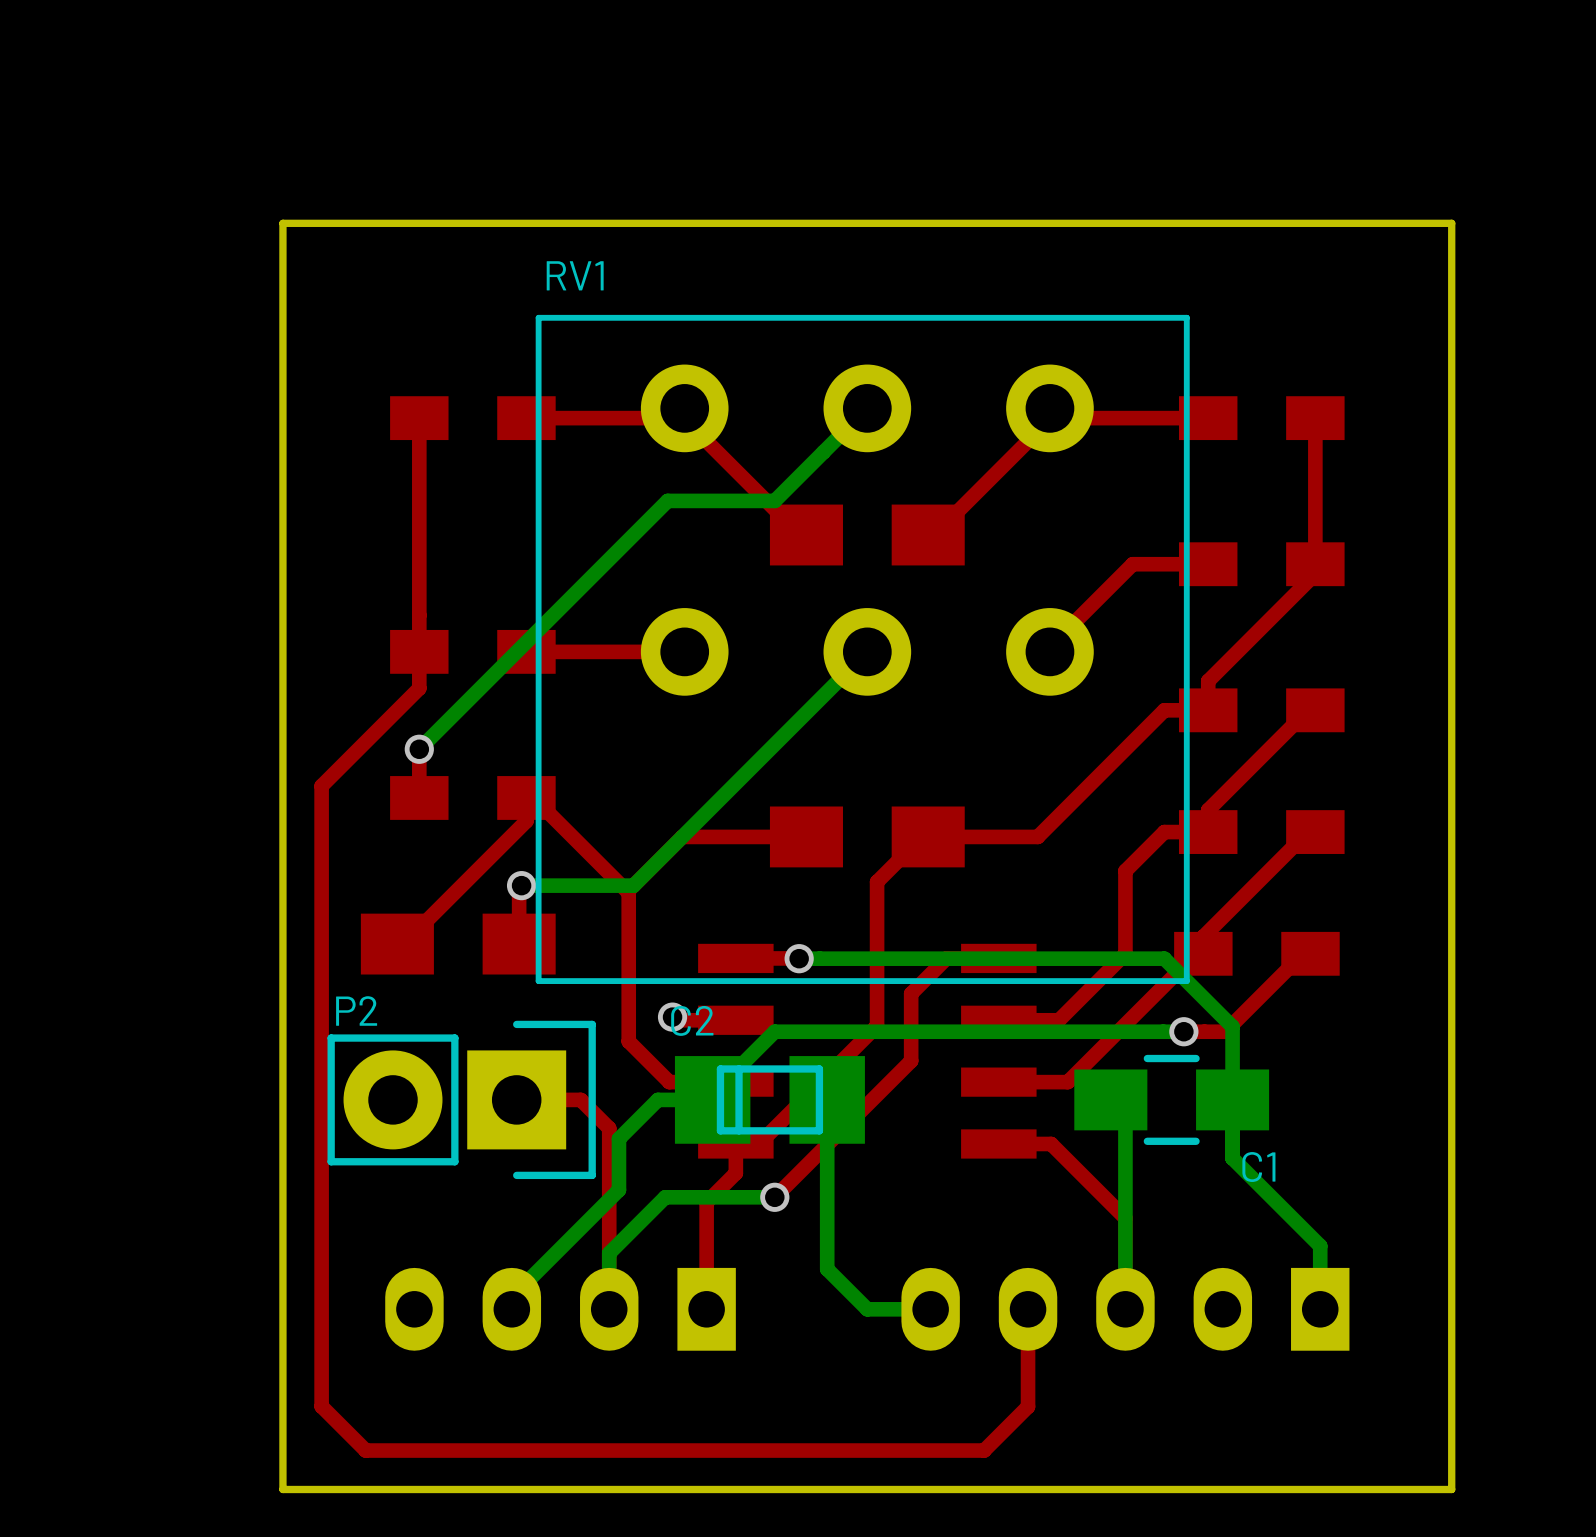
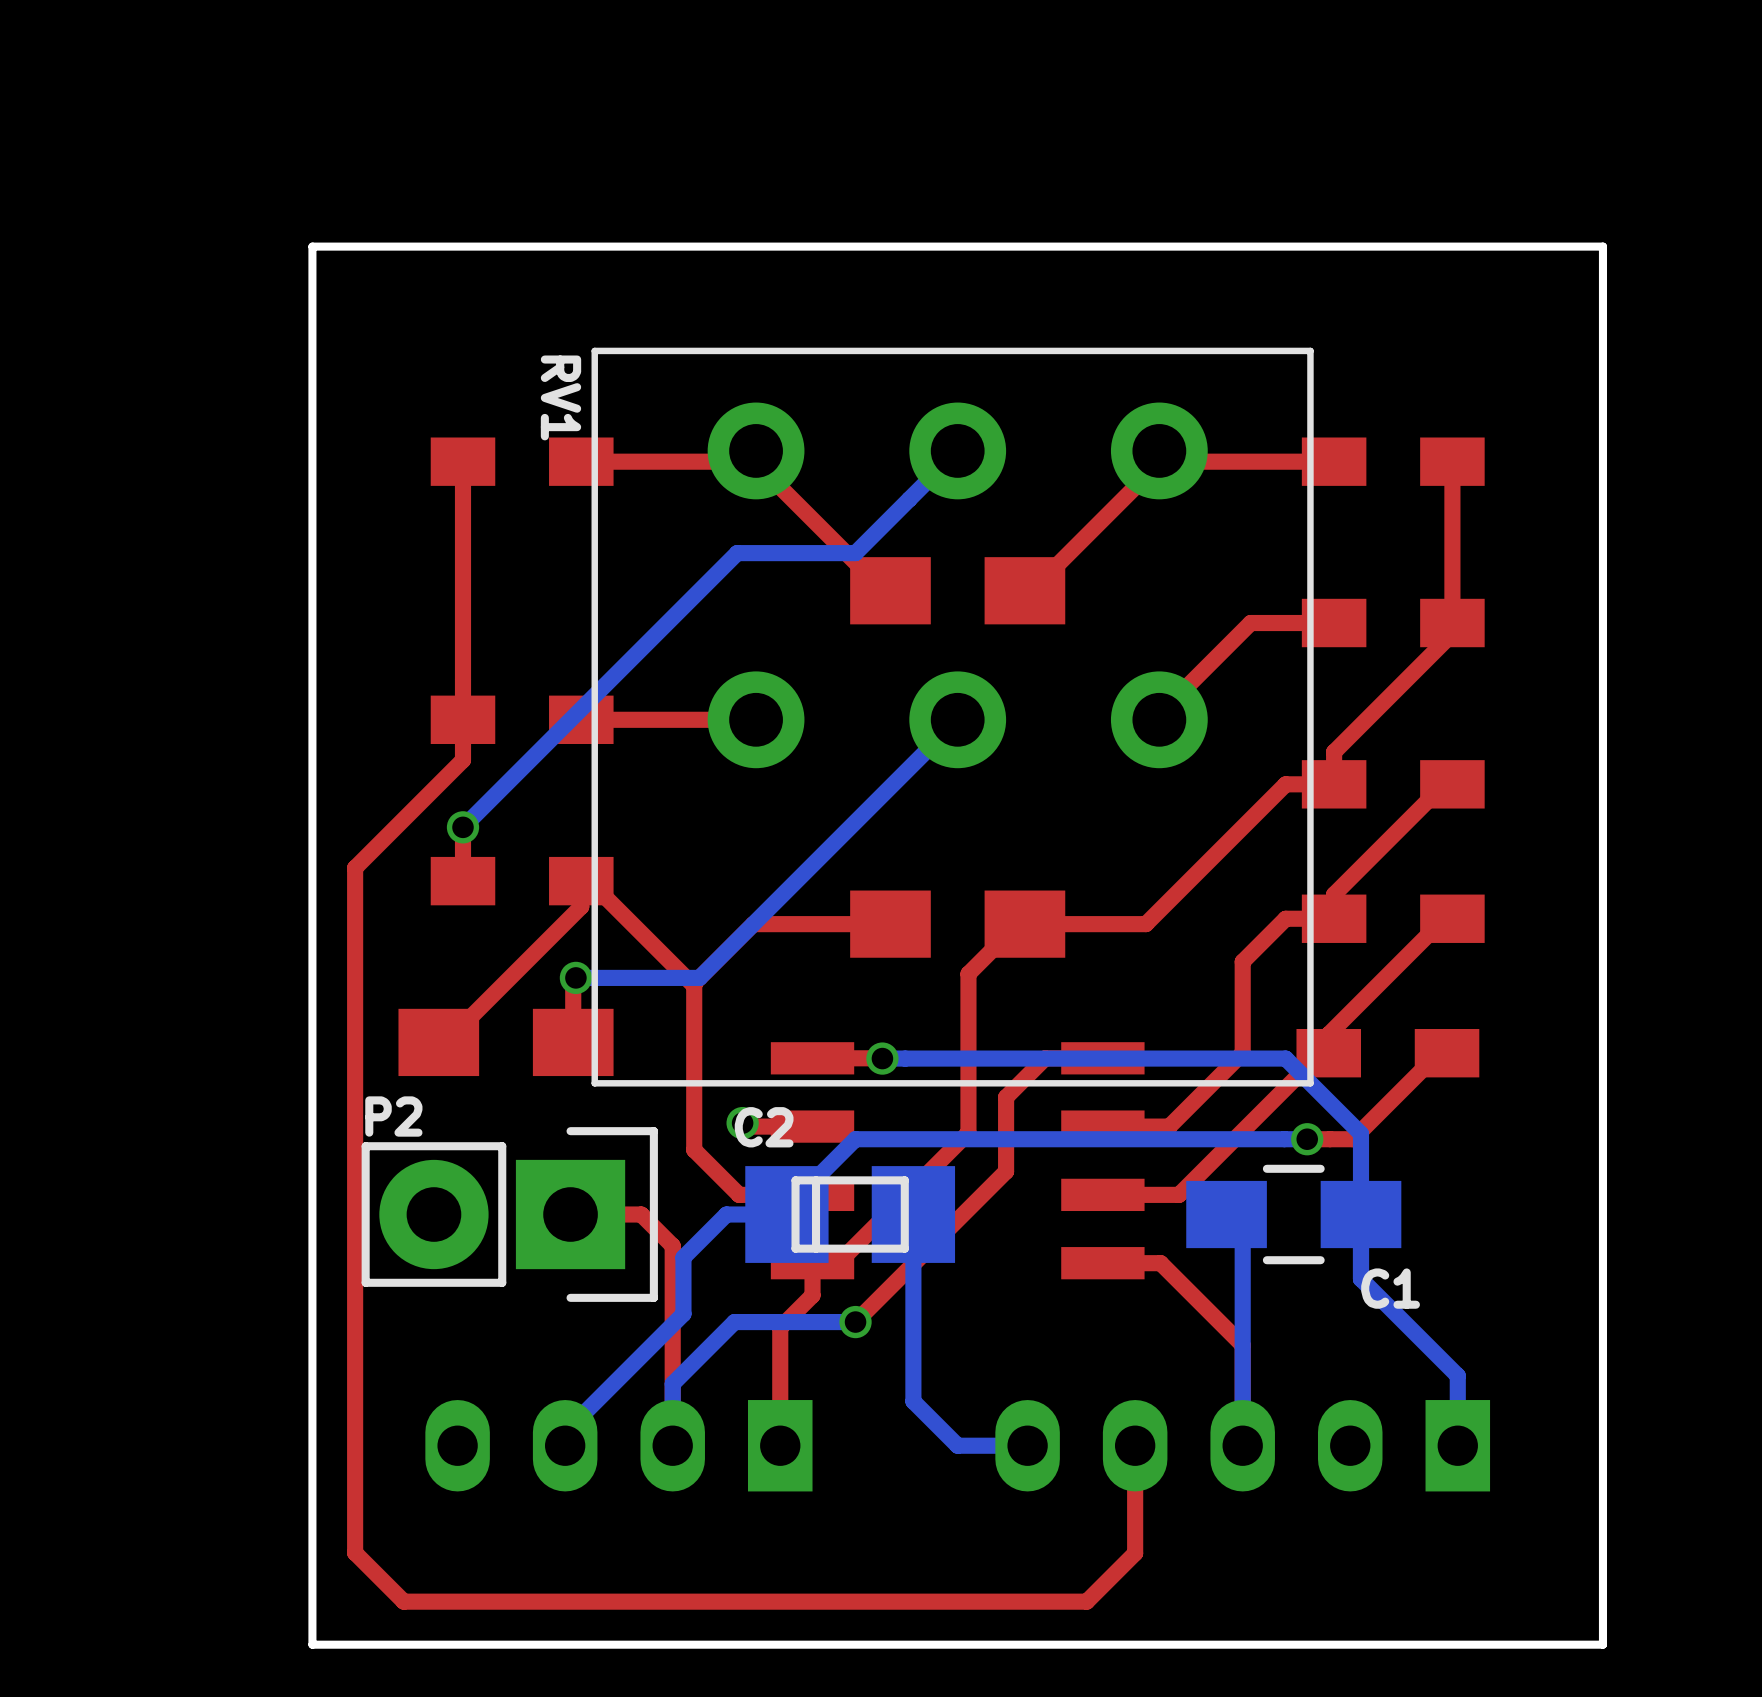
RV1 name rotation: 0° (575, 275) -> 90° clockwise (560, 397)
RV1 name position: RV1 (575, 275) -> RV1 (560, 397)

